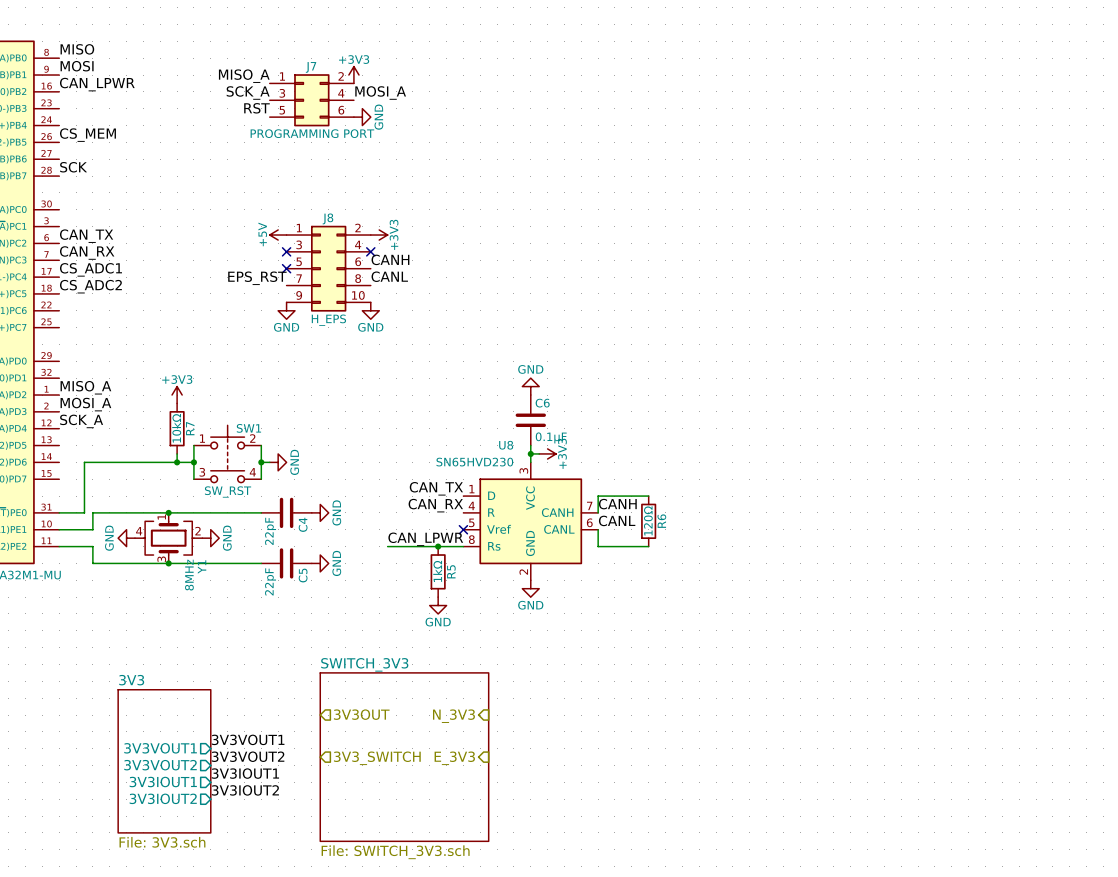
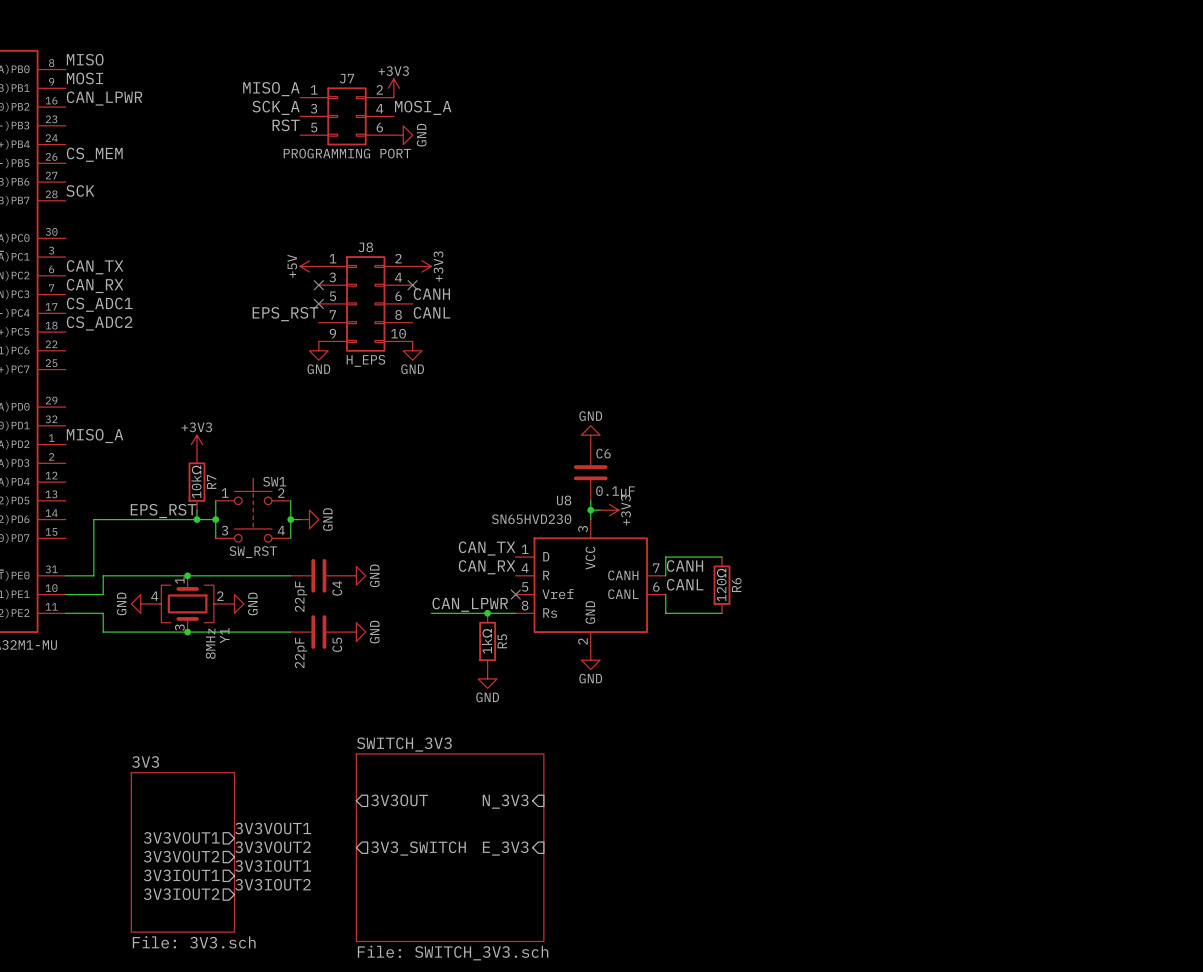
label: MOSI_A (85, 404) -> none
label: SCK_A (81, 421) -> none
label: none -> EPS_RST (163, 511)

